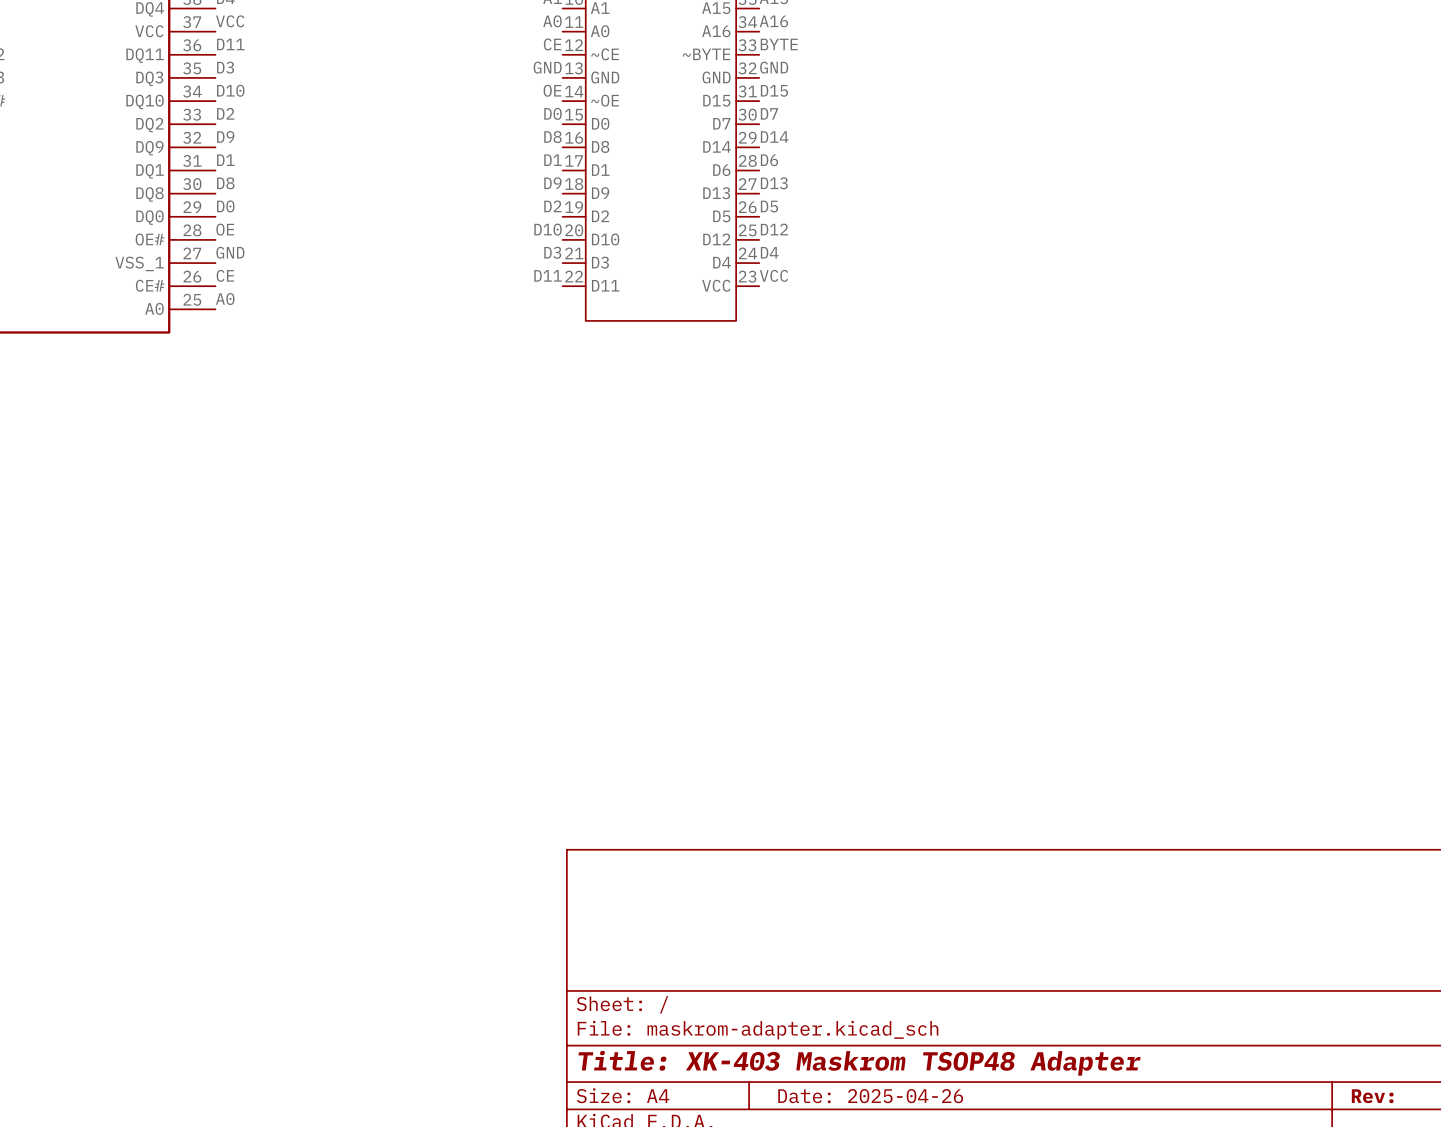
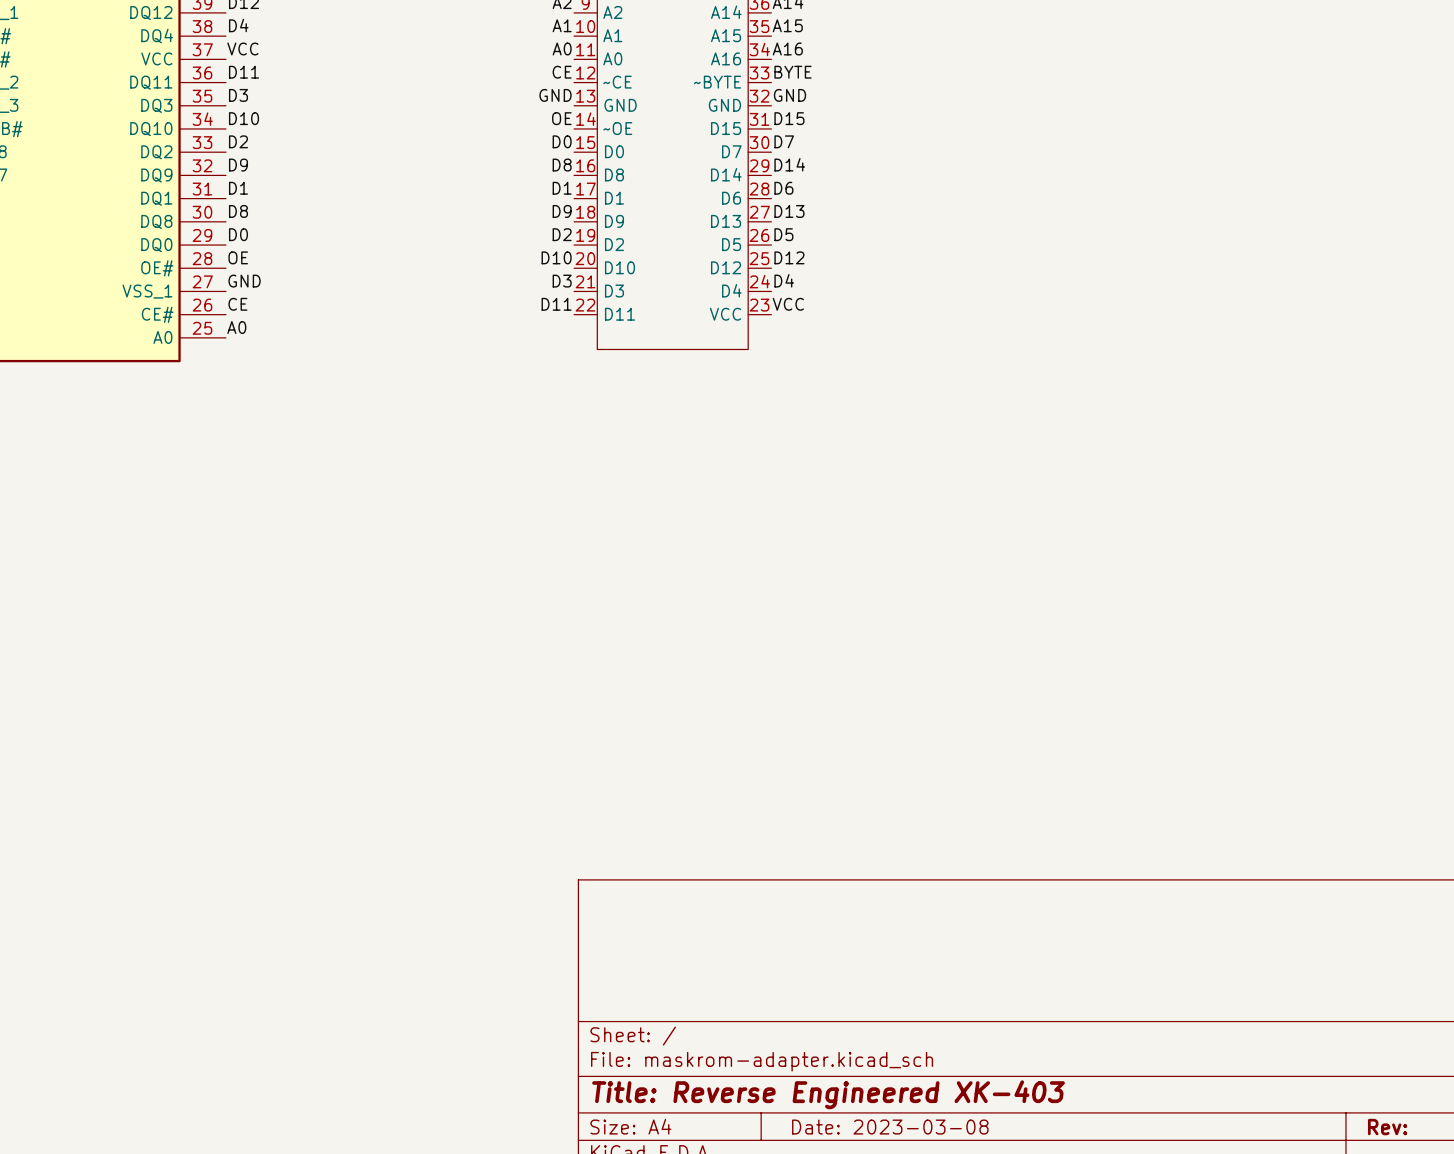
title block: Title: XK-403 Maskrom TSOP48 Adapter (859, 1063) -> Title: Reverse Engineered XK-403 (828, 1094)
title block: Date: 2025-04-26 (870, 1096) -> Date: 2023-03-08 (890, 1127)

